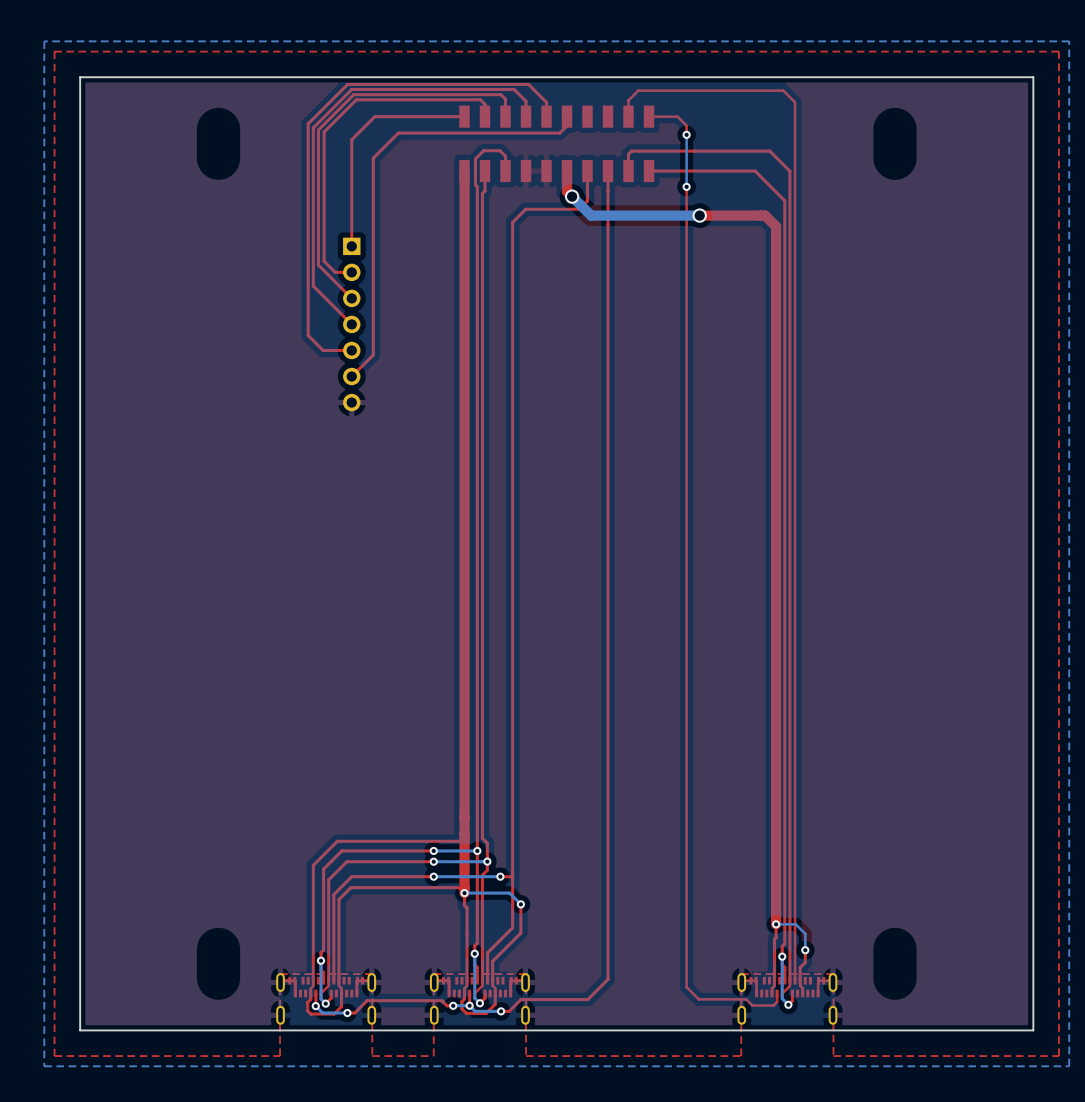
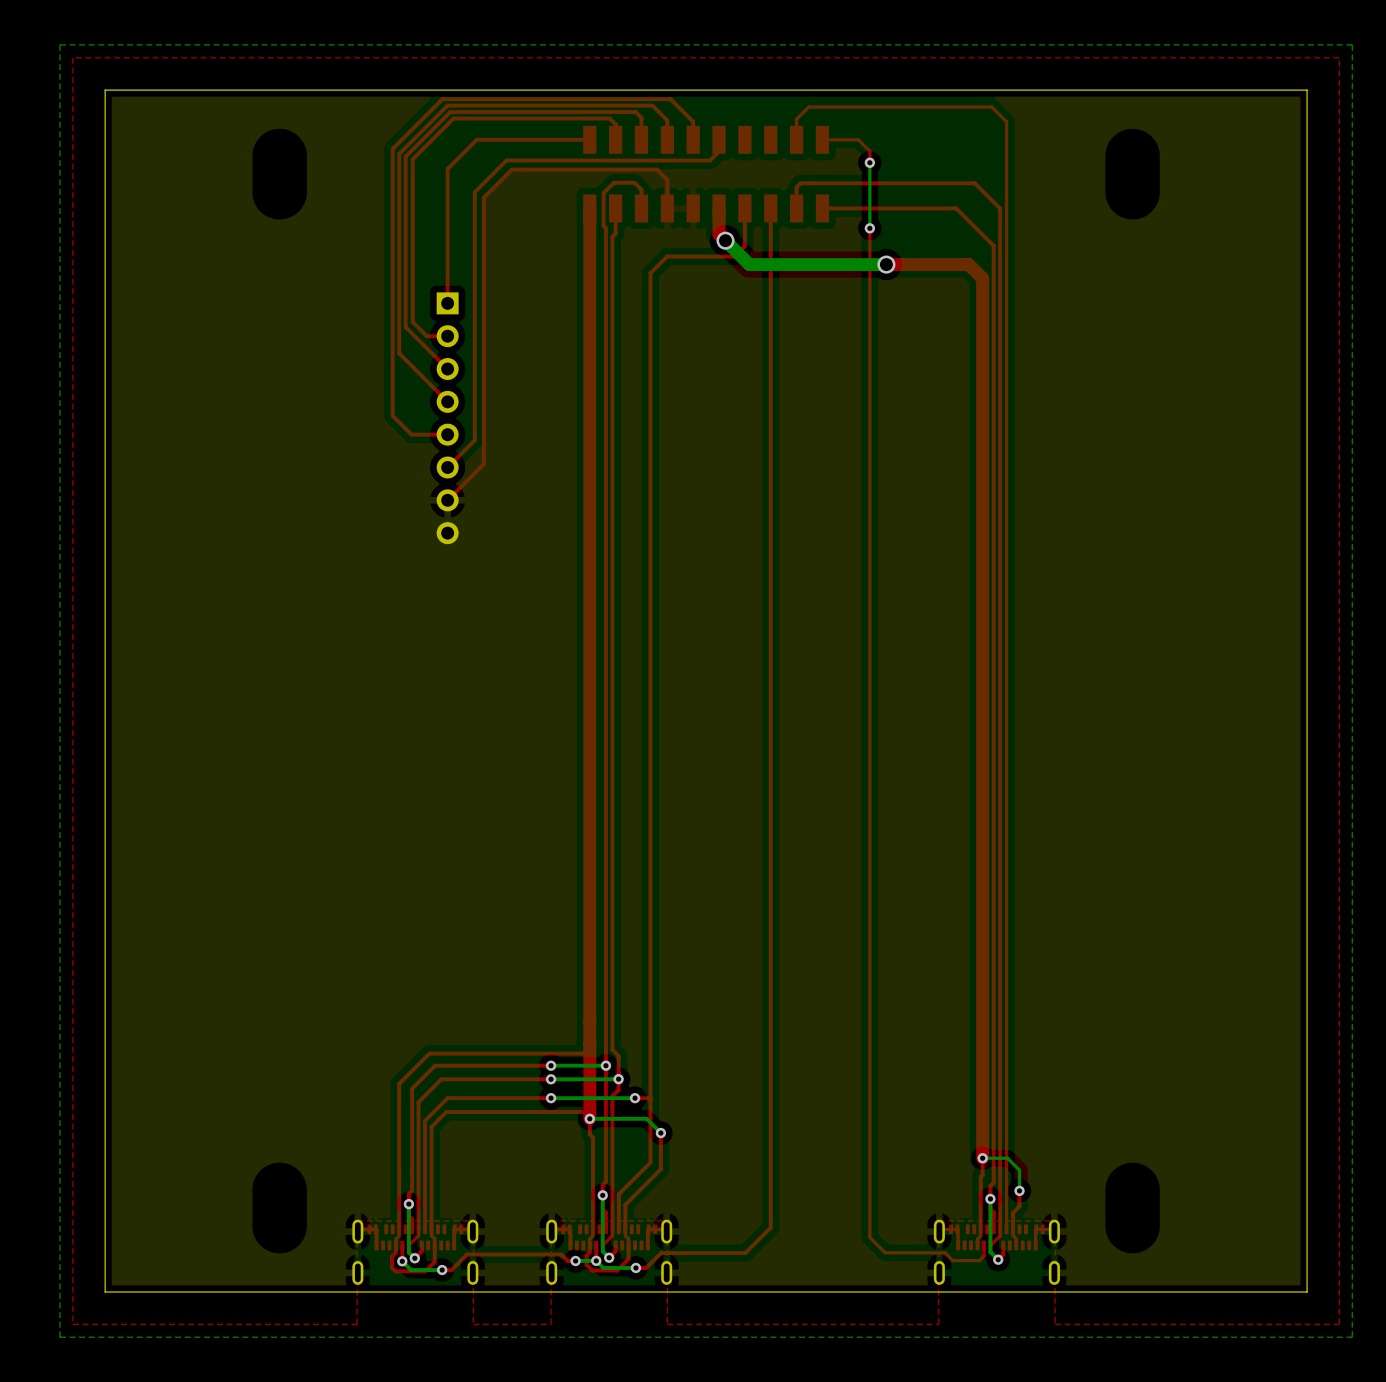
top track: none -> (667, 208) (667, 179) (657, 169) (511, 169) (483, 197) (483, 464) (447, 500)
part: (351, 324) -> none
part: none -> (447, 418)

